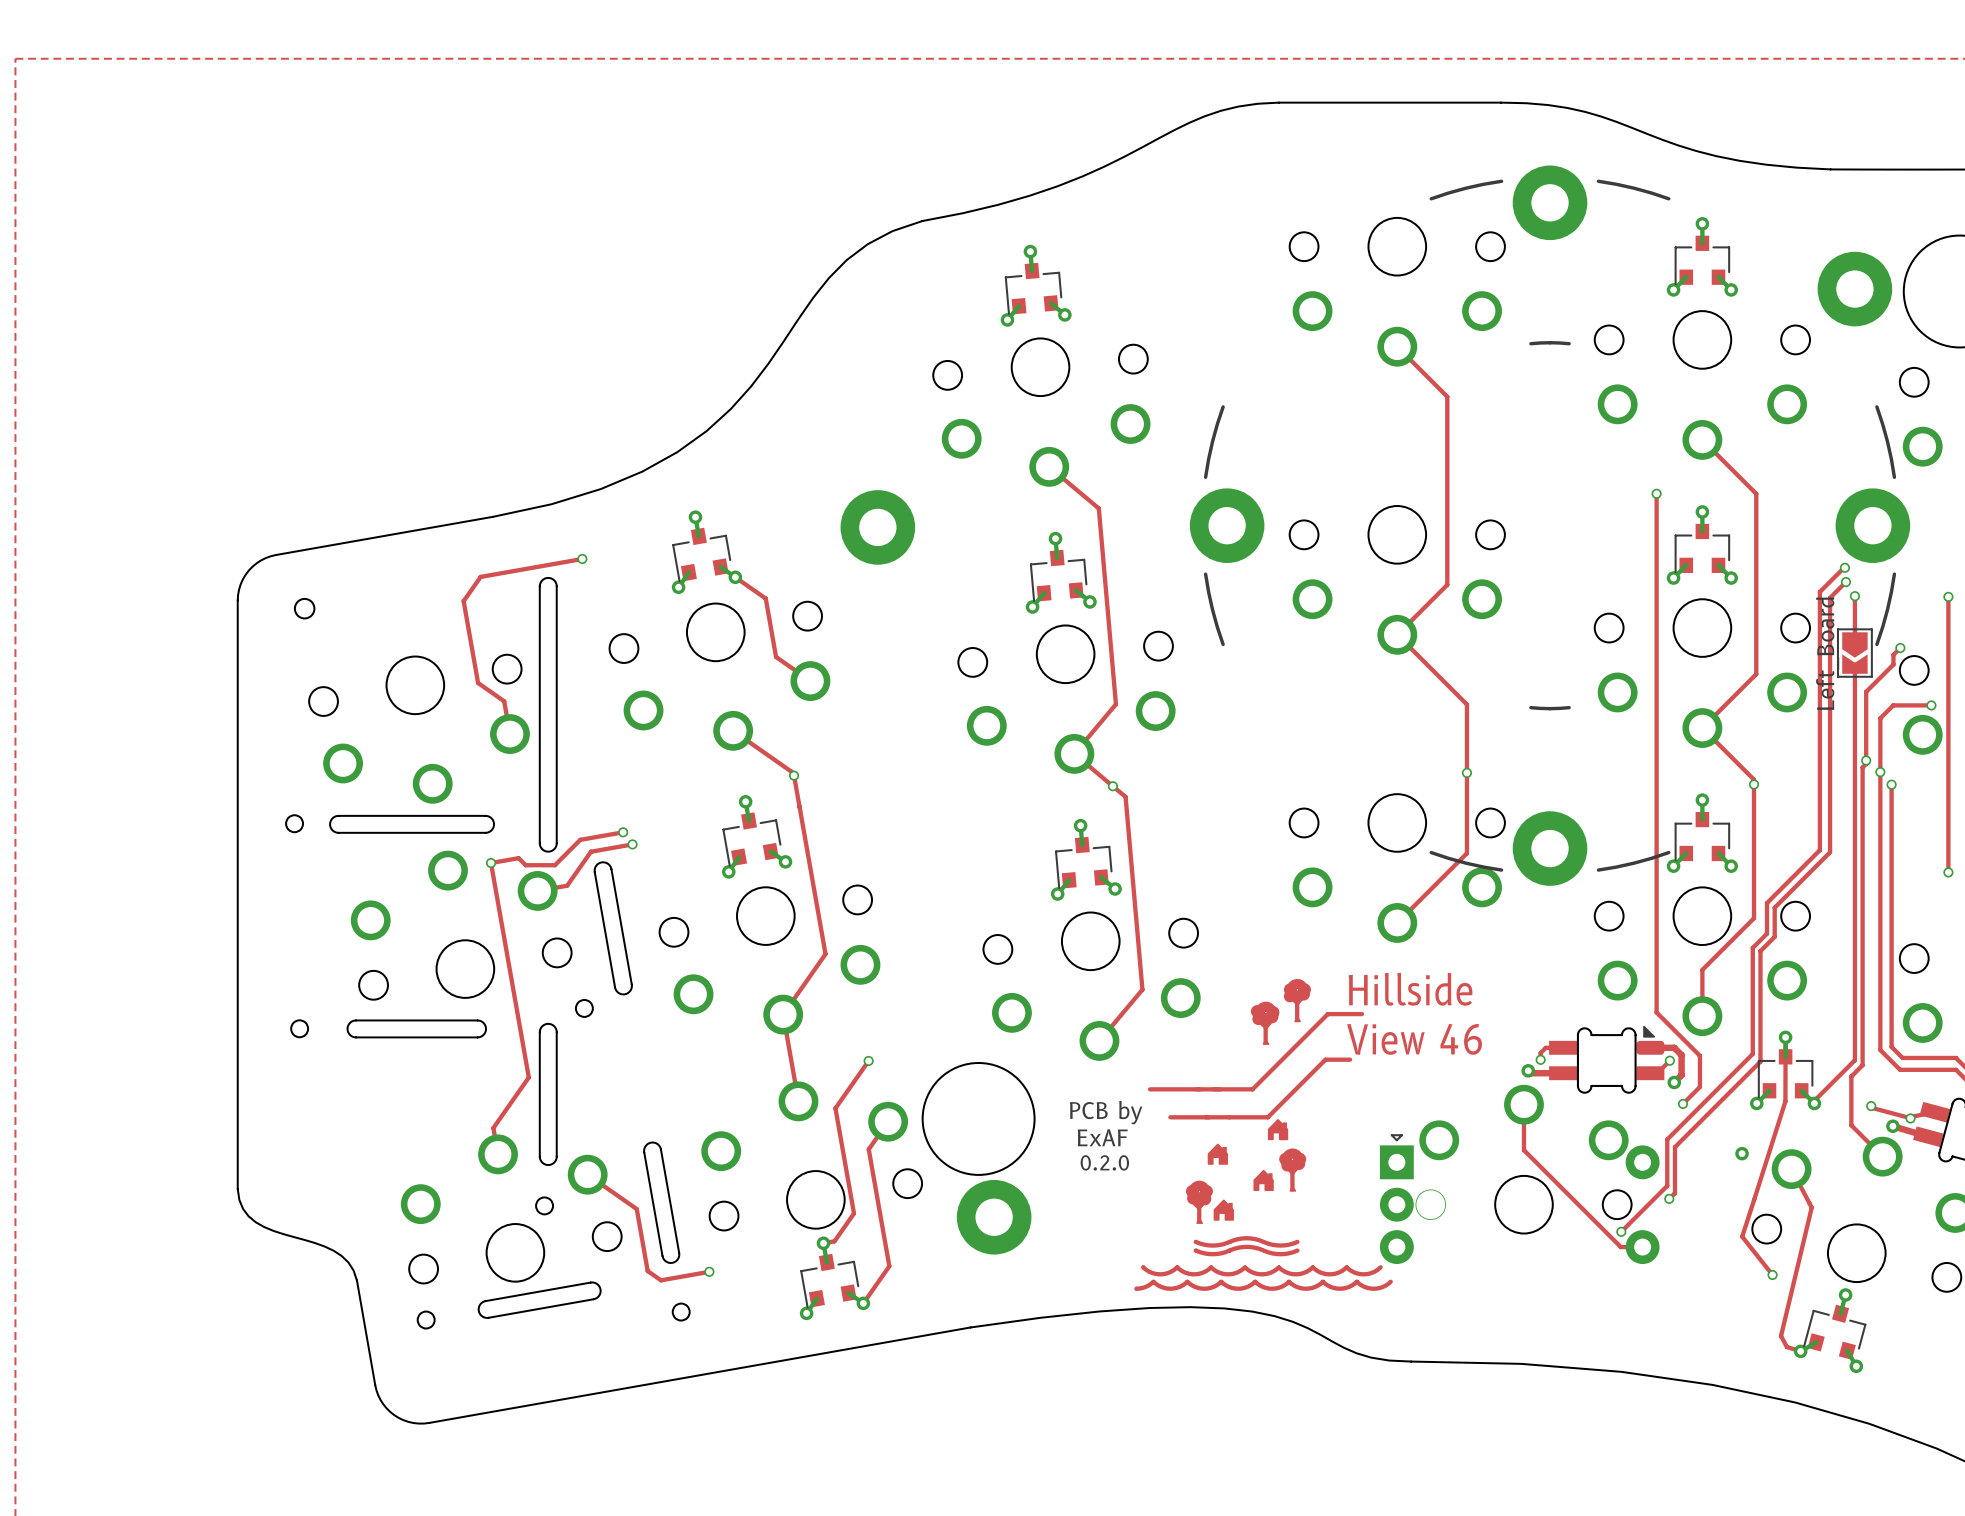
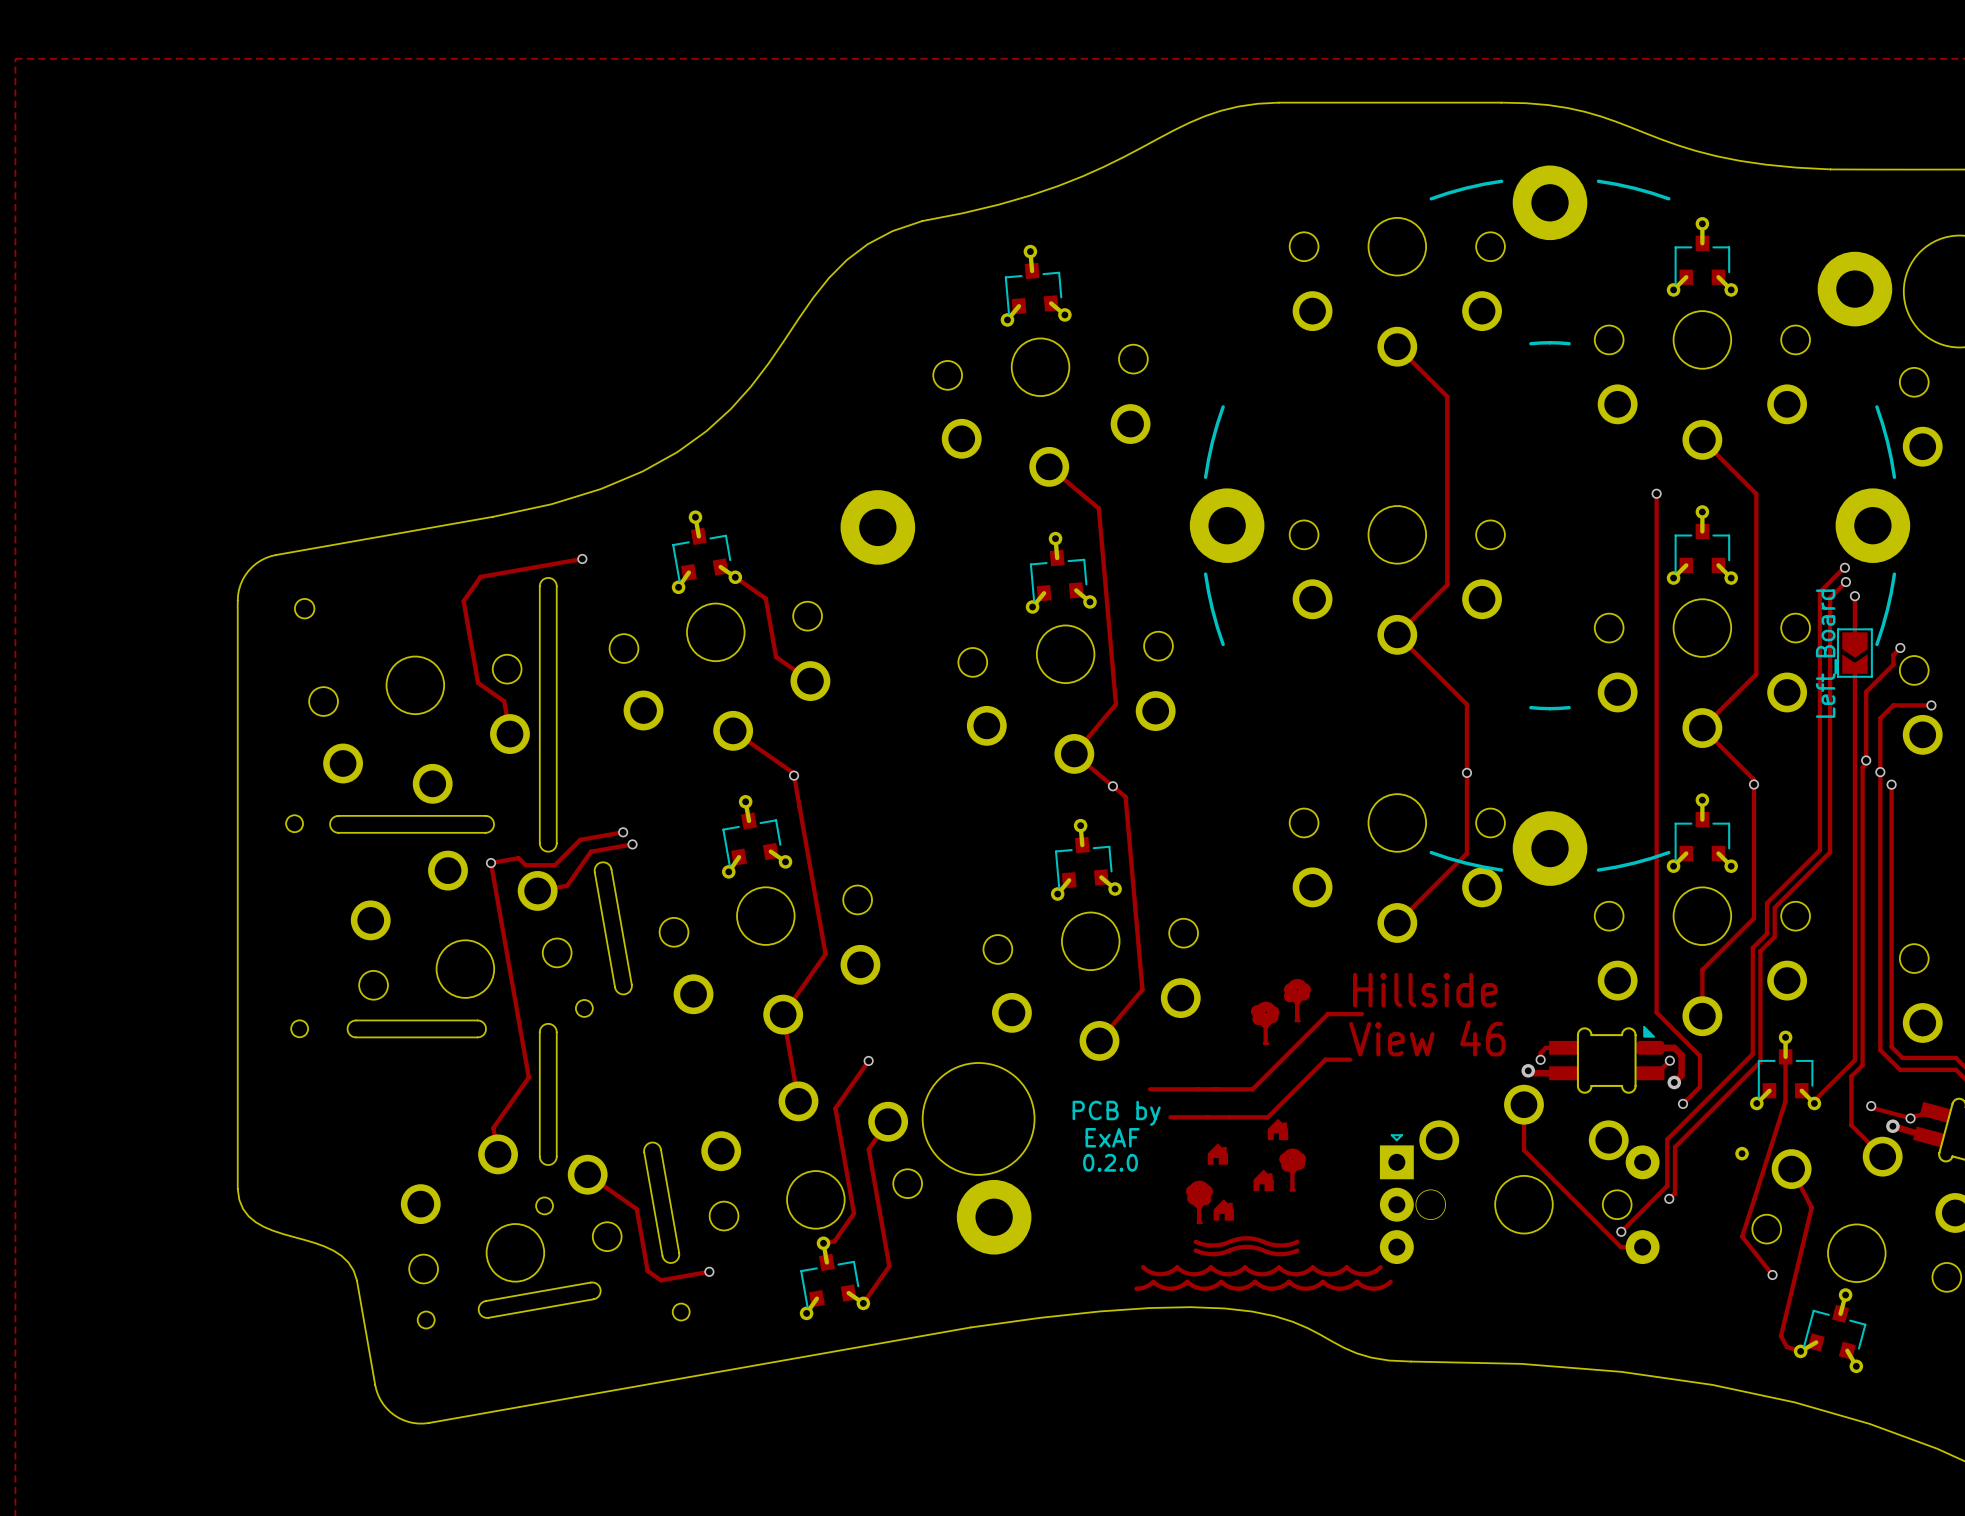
track: (1948, 596) (1948, 872) -> none
via: (1948, 596) -> none
via: (1948, 872) -> none

